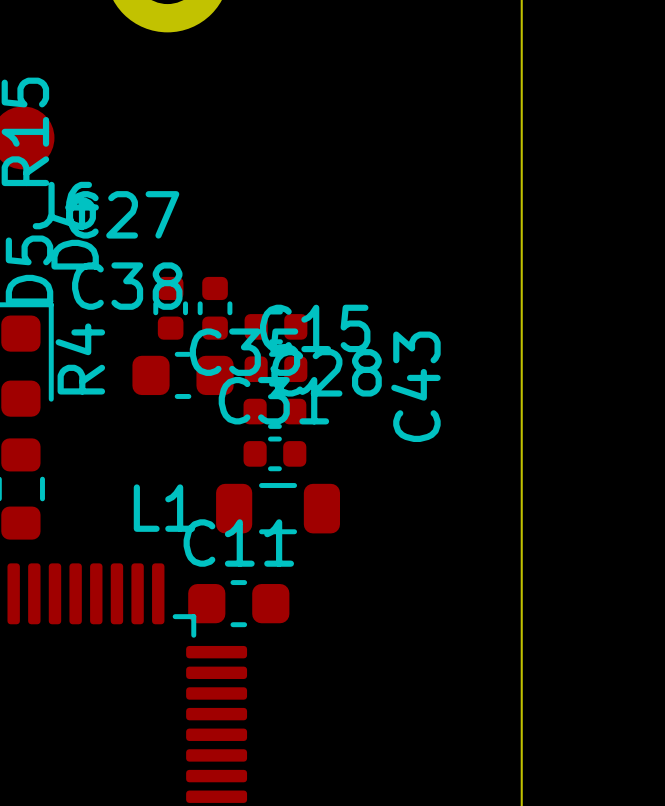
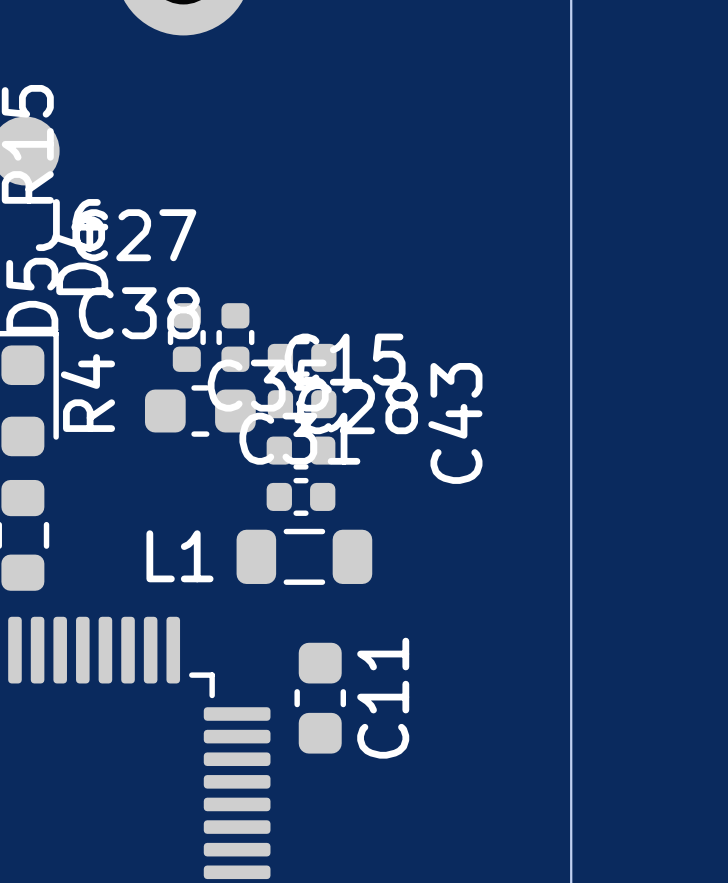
C11 rotation: 0° (238, 603) -> 90° clockwise (320, 698)
C11 position: (238, 603) -> (320, 698)

